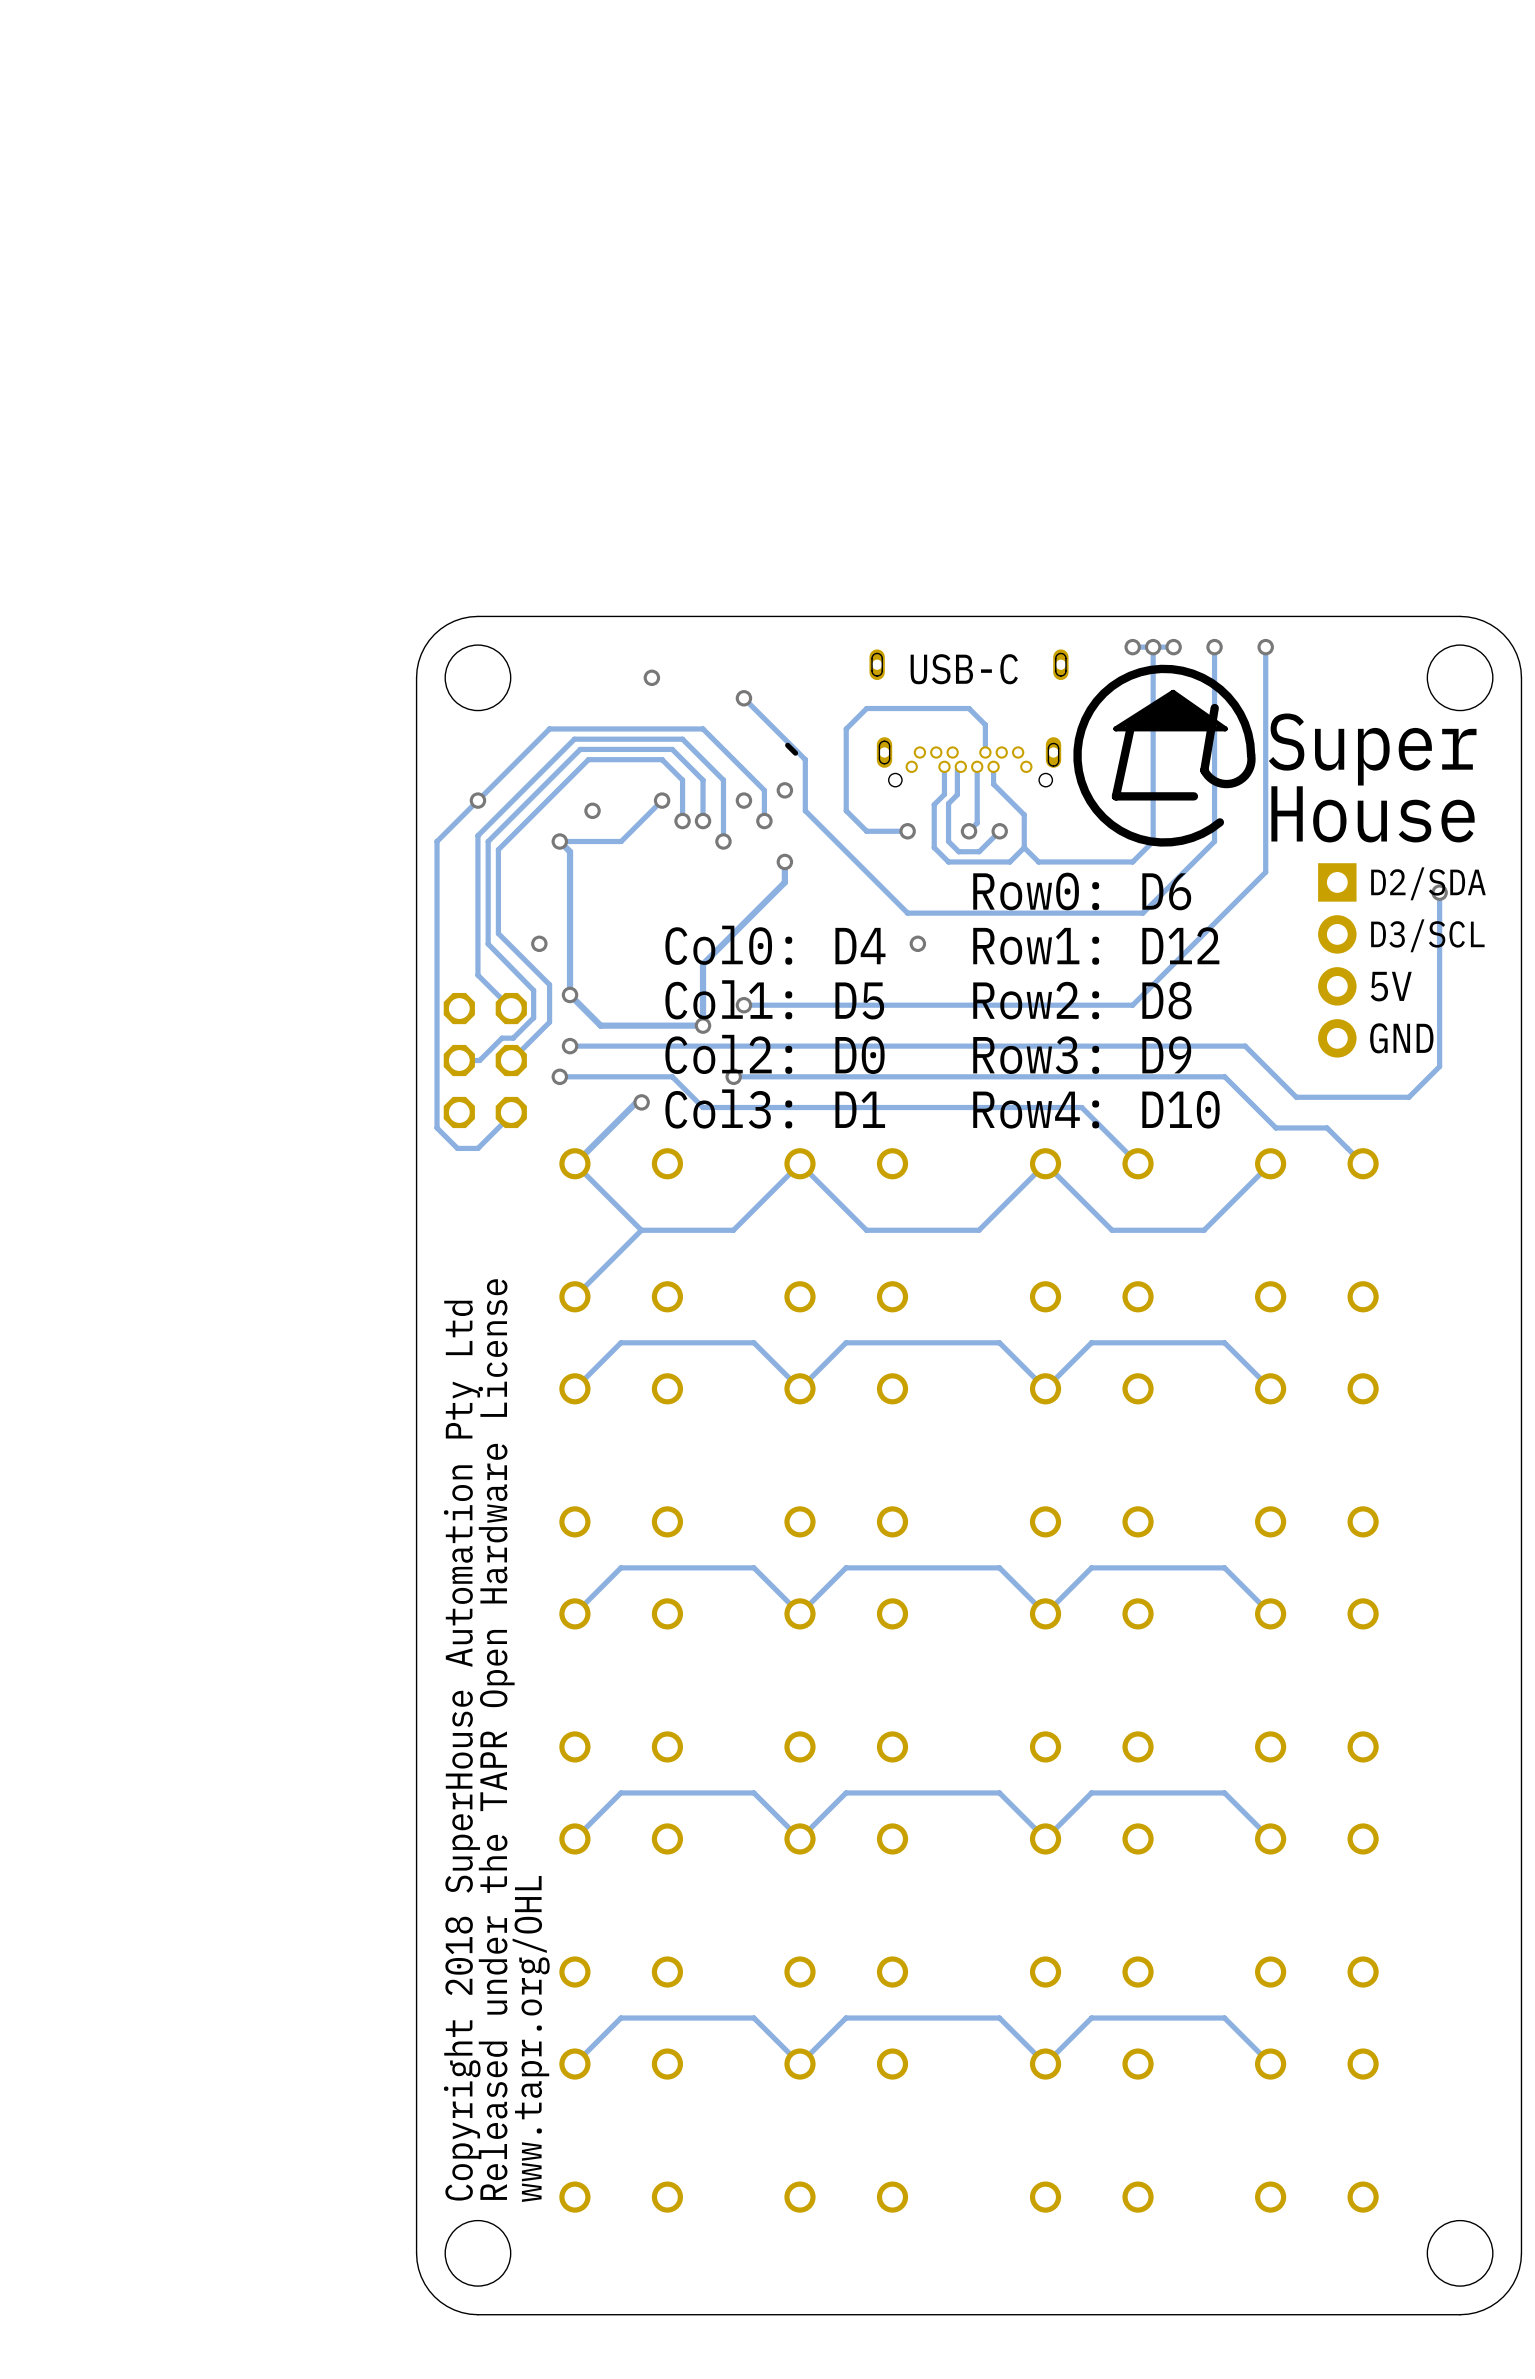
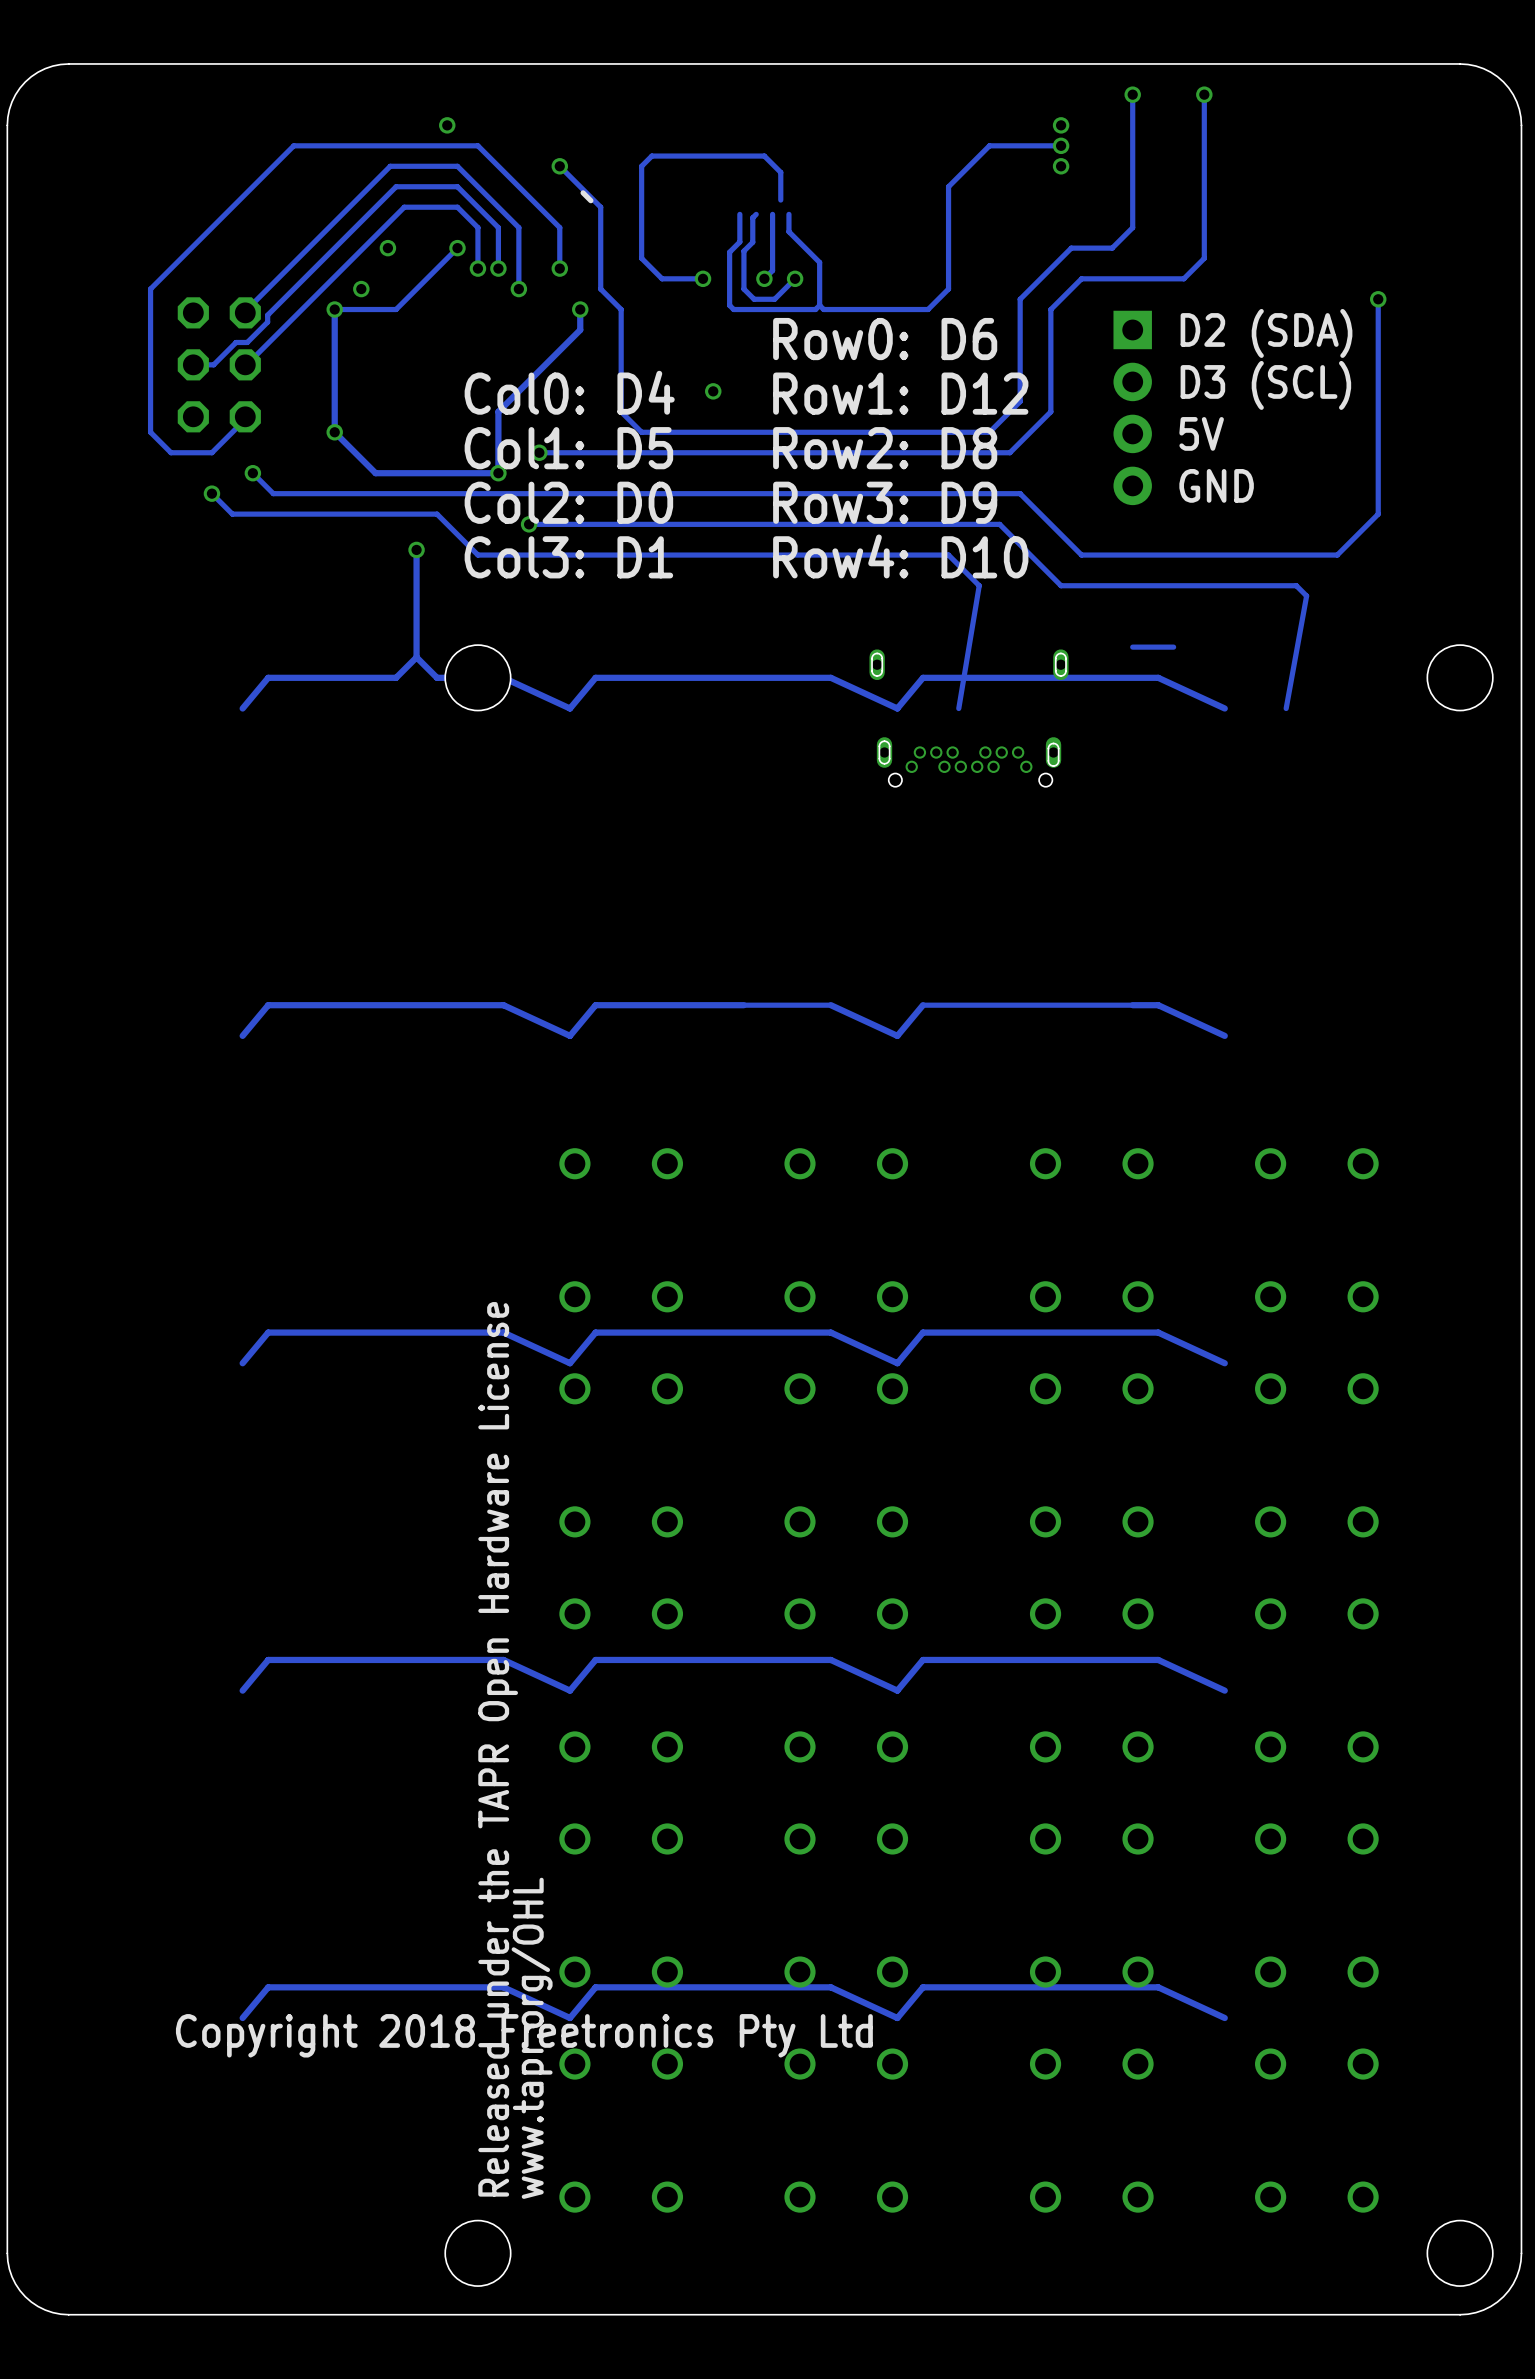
track: none -> (1132, 94) (1132, 227) (1112, 248) (1071, 248) (1020, 299) (1020, 401) (989, 432) (641, 432) (621, 411) (621, 309) (600, 289) (600, 207) (559, 166)
via: none -> (1132, 94)
track: none -> (1204, 94) (1204, 258) (1183, 278) (1081, 278) (1050, 309) (1050, 411) (1009, 452) (539, 452)
via: none -> (1204, 94)
via: none -> (447, 125)
via: none -> (1061, 125)
track: none -> (1061, 145) (989, 145) (948, 186) (948, 289) (928, 309) (823, 309) (819, 305)
via: none -> (1061, 145)
via: none -> (559, 166)
via: none -> (1061, 166)
line: none -> (583, 192) (590, 200)
track: none -> (780, 200) (780, 172) (764, 156) (651, 156) (641, 166) (641, 258) (662, 278) (703, 278)
track: none -> (739, 214) (739, 241) (729, 252) (729, 305) (733, 309) (815, 309) (819, 305)
track: none -> (756, 214) (752, 217) (752, 242) (743, 251) (743, 289) (754, 299) (774, 299) (795, 278)
track: none -> (772, 214) (772, 270) (764, 278)
track: none -> (788, 214) (788, 231) (819, 262) (819, 305)
via: none -> (387, 248)
track: none -> (457, 248) (396, 309) (334, 309) (334, 432) (375, 473) (498, 473) (498, 411) (580, 329) (580, 309)
via: none -> (457, 248)
track: none -> (477, 268) (477, 227) (457, 207) (404, 207) (245, 364)
via: none -> (477, 268)
track: none -> (498, 268) (498, 227) (457, 186) (396, 186) (267, 315) (267, 322) (247, 342) (236, 342) (213, 364) (189, 364)
via: none -> (498, 268)
track: none -> (559, 268) (559, 227) (477, 145) (293, 145) (150, 289) (150, 432) (171, 452) (211, 452) (245, 419) (245, 416)
via: none -> (559, 268)
via: none -> (703, 278)
via: none -> (764, 278)
via: none -> (795, 278)
via: none -> (361, 289)
track: none -> (518, 289) (518, 227) (457, 166) (390, 166) (243, 312) (245, 312)
via: none -> (518, 289)
track: none -> (1378, 299) (1378, 514) (1337, 555) (1081, 555) (1020, 493) (273, 493) (252, 473)
via: none -> (1378, 299)
via: none -> (334, 309)
via: none -> (580, 309)
text: none -> D2 (SDA) (1266, 333)
text: none -> Row0: D6 (885, 339)
part: none -> (219, 364)
text: none -> D3 (SCL) (1265, 385)
via: none -> (713, 391)
text: none -> Col0: D4 (569, 392)
text: none -> Row1: D12 (900, 393)
part: none -> (1132, 407)
via: none -> (334, 432)
text: none -> 5V (1201, 433)
text: none -> Col1: D5 (568, 448)
text: none -> Row2: D8 (885, 448)
via: none -> (539, 452)
via: none -> (252, 473)
via: none -> (498, 473)
text: none -> GND (1216, 485)
track: none -> (211, 493) (232, 514) (437, 514) (477, 555) (948, 555) (979, 585) (958, 708)
via: none -> (211, 493)
text: none -> Col2: D0 (568, 502)
text: none -> Row3: D9 (885, 502)
track: none -> (529, 524) (999, 524) (1061, 585) (1296, 585) (1306, 595) (1286, 708)
via: none -> (529, 524)
track: none -> (416, 549) (416, 657)
via: none -> (416, 549)
text: none -> Col3: D1 (568, 557)
text: none -> Row4: D10 (900, 556)
via: (1132, 647) -> none
track: (1153, 647) (1153, 841) (1132, 861) (1038, 861) (1024, 847) -> none
via: (1153, 647) -> none
via: (1173, 647) -> none
track: (1214, 647) (1214, 841) (1142, 913) (907, 913) (805, 810) (805, 759) (743, 698) -> none
via: (1214, 647) -> none
track: (1265, 647) (1265, 872) (1132, 1005) -> (1224, 1035) (1158, 1005) (1132, 1005)
via: (1265, 647) -> none
track: none -> (416, 657) (437, 677) (503, 677) (570, 708) (595, 677) (830, 677) (897, 708) (922, 677) (1158, 677) (1224, 708)
track: none -> (416, 657) (396, 677) (268, 677) (242, 708)
text: USB-C (964, 669) -> none
via: (651, 677) -> none
board edge: (1521, 677) (1516, 654) (1503, 634) (1483, 621) (1460, 616) (477, 616) (462, 618) (447, 624) (434, 634) (424, 647) (418, 661) (416, 677) (416, 2253) (421, 2276) (434, 2296) (454, 2310) (477, 2314) -> (1521, 677) (1521, 125) (1519, 109) (1508, 87) (1497, 76) (1483, 68) (1460, 63) (68, 63) (52, 66) (38, 72) (25, 81) (15, 94) (9, 109) (7, 125) (7, 2253) (9, 2269) (20, 2290) (31, 2302) (45, 2310) (60, 2314) (477, 2314)
line: (1173, 692) (1115, 728) (1225, 728) (1173, 692) -> none
via: (743, 698) -> none
line: (1173, 708) (1162, 713) (1188, 713) (1173, 702) (1141, 718) (1199, 718) -> none
line: (1214, 708) (1204, 770) (1210, 777) (1218, 782) (1234, 782) (1245, 775) (1251, 761) (1248, 733) (1240, 713) (1228, 696) (1211, 683) (1192, 673) (1171, 669) (1140, 672) (1120, 680) (1103, 693) (1085, 719) (1078, 739) (1077, 760) (1081, 781) (1096, 809) (1111, 824) (1129, 835) (1160, 842) (1181, 840) (1202, 833) (1219, 822) -> none
line: (1126, 723) (1209, 723) (1173, 697) (1131, 723) (1115, 796) (1193, 796) -> none
line: (787, 745) (795, 753) -> none
text: Super (1372, 749) -> none
track: (985, 752) (985, 724) (969, 708) (866, 708) (846, 728) (846, 810) (866, 831) (907, 831) -> none
track: (944, 766) (944, 794) (934, 804) (934, 847) (948, 861) (1009, 861) (1024, 847) -> none
track: (960, 766) (957, 770) (957, 794) (948, 803) (948, 841) (958, 851) (979, 851) (999, 831) -> none
track: (977, 766) (977, 823) (969, 831) -> none
track: (993, 766) (993, 784) (1024, 814) (1024, 847) -> none
via: (784, 790) -> none
via: (477, 800) -> none
track: (662, 800) (621, 841) (559, 841) (570, 851) (570, 994) (600, 1025) (703, 1025) (703, 964) (784, 882) (784, 861) -> none
via: (662, 800) -> none
via: (743, 800) -> none
via: (592, 810) -> none
text: House (1373, 814) -> none
track: (682, 821) (682, 780) (662, 759) (588, 759) (498, 849) (498, 933) (549, 984) (549, 1022) (511, 1060) -> none
via: (682, 821) -> none
track: (703, 821) (703, 780) (672, 749) (580, 749) (488, 841) (488, 944) (533, 990) (533, 1017) (513, 1038) (502, 1038) (479, 1060) (455, 1060) -> none
via: (703, 821) -> none
track: (764, 821) (764, 790) (703, 728) (549, 728) (437, 841) (437, 1127) (457, 1148) (477, 1148) (511, 1115) (511, 1112) -> none
via: (764, 821) -> none
via: (907, 831) -> none
via: (969, 831) -> none
via: (999, 831) -> none
via: (559, 841) -> none
track: (723, 841) (723, 780) (682, 739) (574, 739) (477, 835) (477, 975) (511, 1008) -> none
via: (723, 841) -> none
via: (784, 861) -> none
text: D2/SDA (1428, 883) -> none
text: Row0: D6 (1082, 891) -> none
track: (1439, 892) (1439, 1066) (1408, 1097) (1296, 1097) (1245, 1046) (570, 1046) -> none
via: (1439, 892) -> none
text: D3/SCL (1427, 935) -> none
via: (539, 943) -> none
via: (917, 943) -> none
text: Col0: D4 (775, 945) -> none
text: Row1: D12 (1096, 946) -> none
part: (1337, 960) -> none
text: 5V (1391, 986) -> none
via: (570, 994) -> none
text: Col1: D5 (774, 999) -> none
text: Row2: D8 (1082, 1000) -> none
track: none -> (743, 1005) (595, 1005) (570, 1035) (503, 1005) (268, 1005) (242, 1035)
via: (743, 1005) -> none
track: (922, 1005) (830, 1005) -> (922, 1005) (897, 1035) (830, 1005)
via: (703, 1025) -> none
text: GND (1401, 1038) -> none
via: (570, 1046) -> none
text: Col2: D0 (775, 1054) -> none
text: Row3: D9 (1082, 1055) -> none
part: (485, 1060) -> none
track: (559, 1076) (672, 1076) (703, 1107) (1081, 1107) (1138, 1163) -> none
via: (559, 1076) -> none
track: (733, 1076) (1224, 1076) (1275, 1127) (1327, 1127) (1363, 1163) -> none
via: (733, 1076) -> none
track: (641, 1102) (636, 1102) (575, 1163) -> none
via: (641, 1102) -> none
text: Col3: D1 (775, 1108) -> none
text: Row4: D10 (1096, 1109) -> none
track: (574, 1163) (641, 1230) -> none
track: (1270, 1163) (1204, 1230) (1112, 1230) (1045, 1163) (979, 1230) (866, 1230) (799, 1163) (733, 1230) (641, 1230) -> none
track: (641, 1230) (574, 1296) -> none
track: none -> (1224, 1363) (1158, 1332) (922, 1332) (897, 1363) (830, 1332) (595, 1332) (570, 1363) (503, 1332) (268, 1332) (242, 1363)
track: (1270, 1388) (1224, 1342) (1091, 1342) (1045, 1388) (999, 1342) (846, 1342) (799, 1388) (753, 1342) (620, 1342) (574, 1388) -> none
track: (1270, 1613) (1224, 1567) (1091, 1567) (1045, 1613) (999, 1567) (846, 1567) (799, 1613) (753, 1567) (620, 1567) (574, 1613) -> none
track: none -> (1224, 1690) (1158, 1659) (922, 1659) (897, 1690) (830, 1659) (595, 1659) (570, 1690) (503, 1659) (268, 1659) (242, 1690)
text: Copyright 2018 SuperHouse Automation Pty Ltd (462, 1750) -> Copyright 2018 Freetronics Pty Ltd (524, 2035)
track: (1270, 1838) (1224, 1792) (1091, 1792) (1045, 1838) (999, 1792) (846, 1792) (799, 1838) (753, 1792) (620, 1792) (574, 1838) -> none
track: none -> (1224, 2018) (1158, 1987) (922, 1987) (897, 2018) (830, 1987) (595, 1987) (570, 2018) (503, 1987) (268, 1987) (242, 2018)
track: (1270, 2064) (1224, 2018) (1091, 2018) (1045, 2064) (999, 2018) (846, 2018) (799, 2064) (753, 2018) (620, 2018) (574, 2064) -> none

